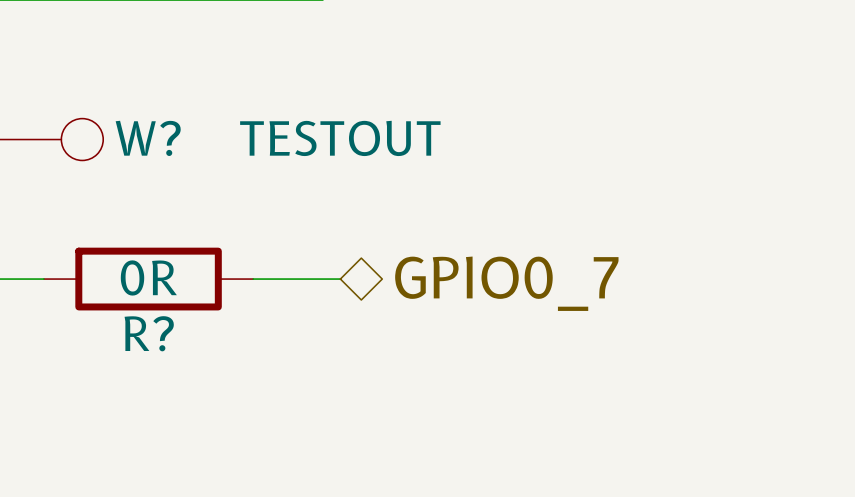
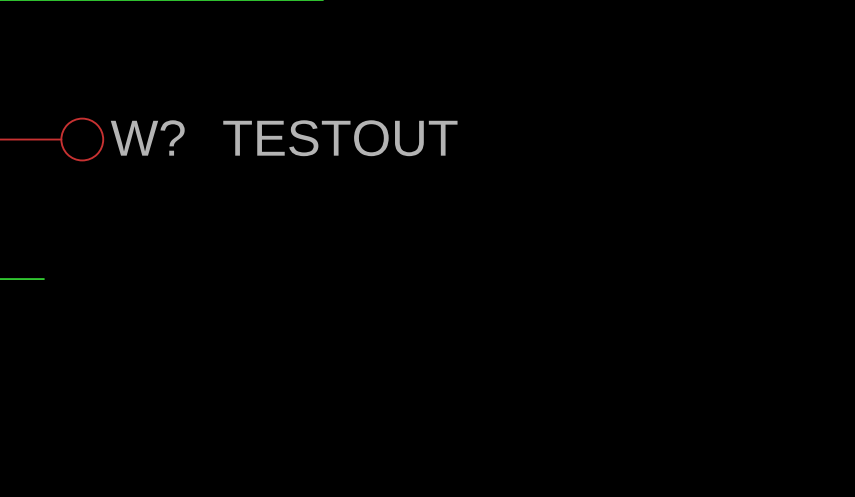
R?: 0R (148, 279) -> none
wire: (253, 279) (340, 279) -> none
hierarchical label: GPIO0_7 (506, 283) -> none

